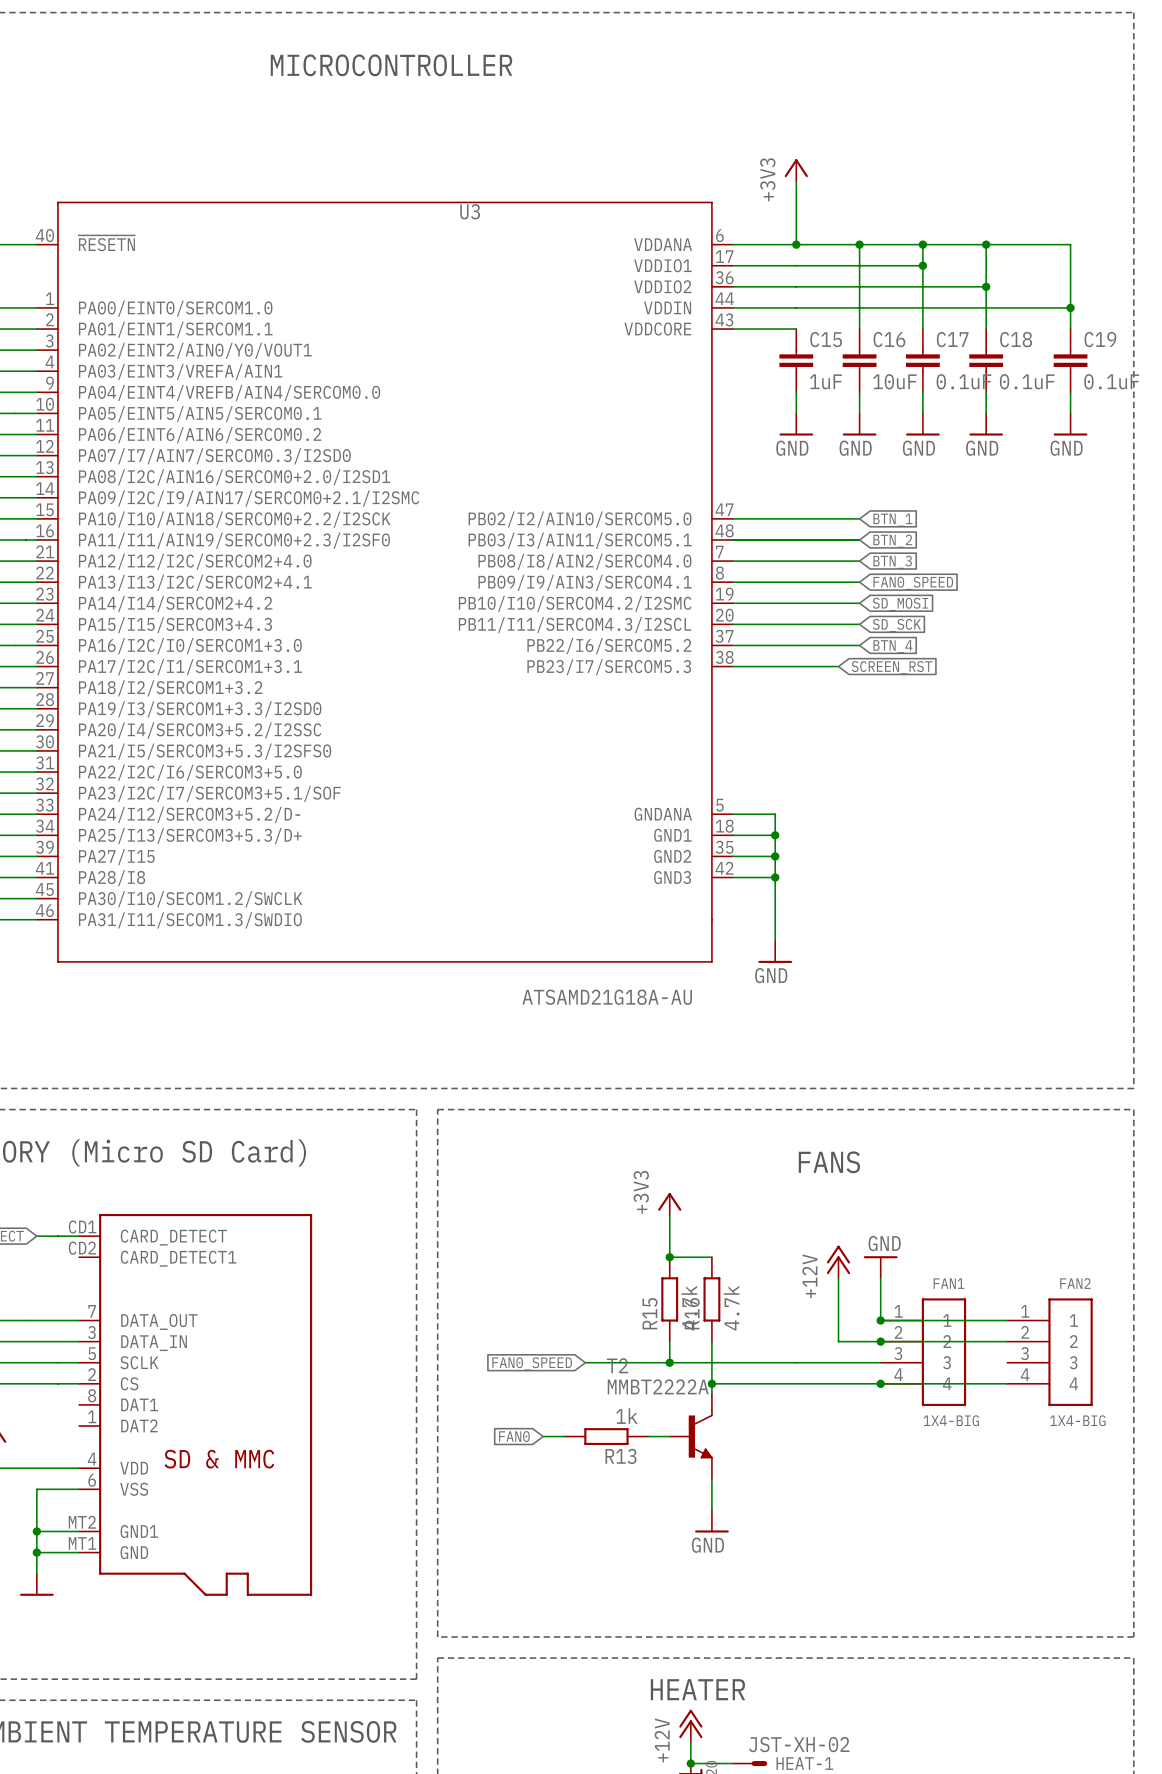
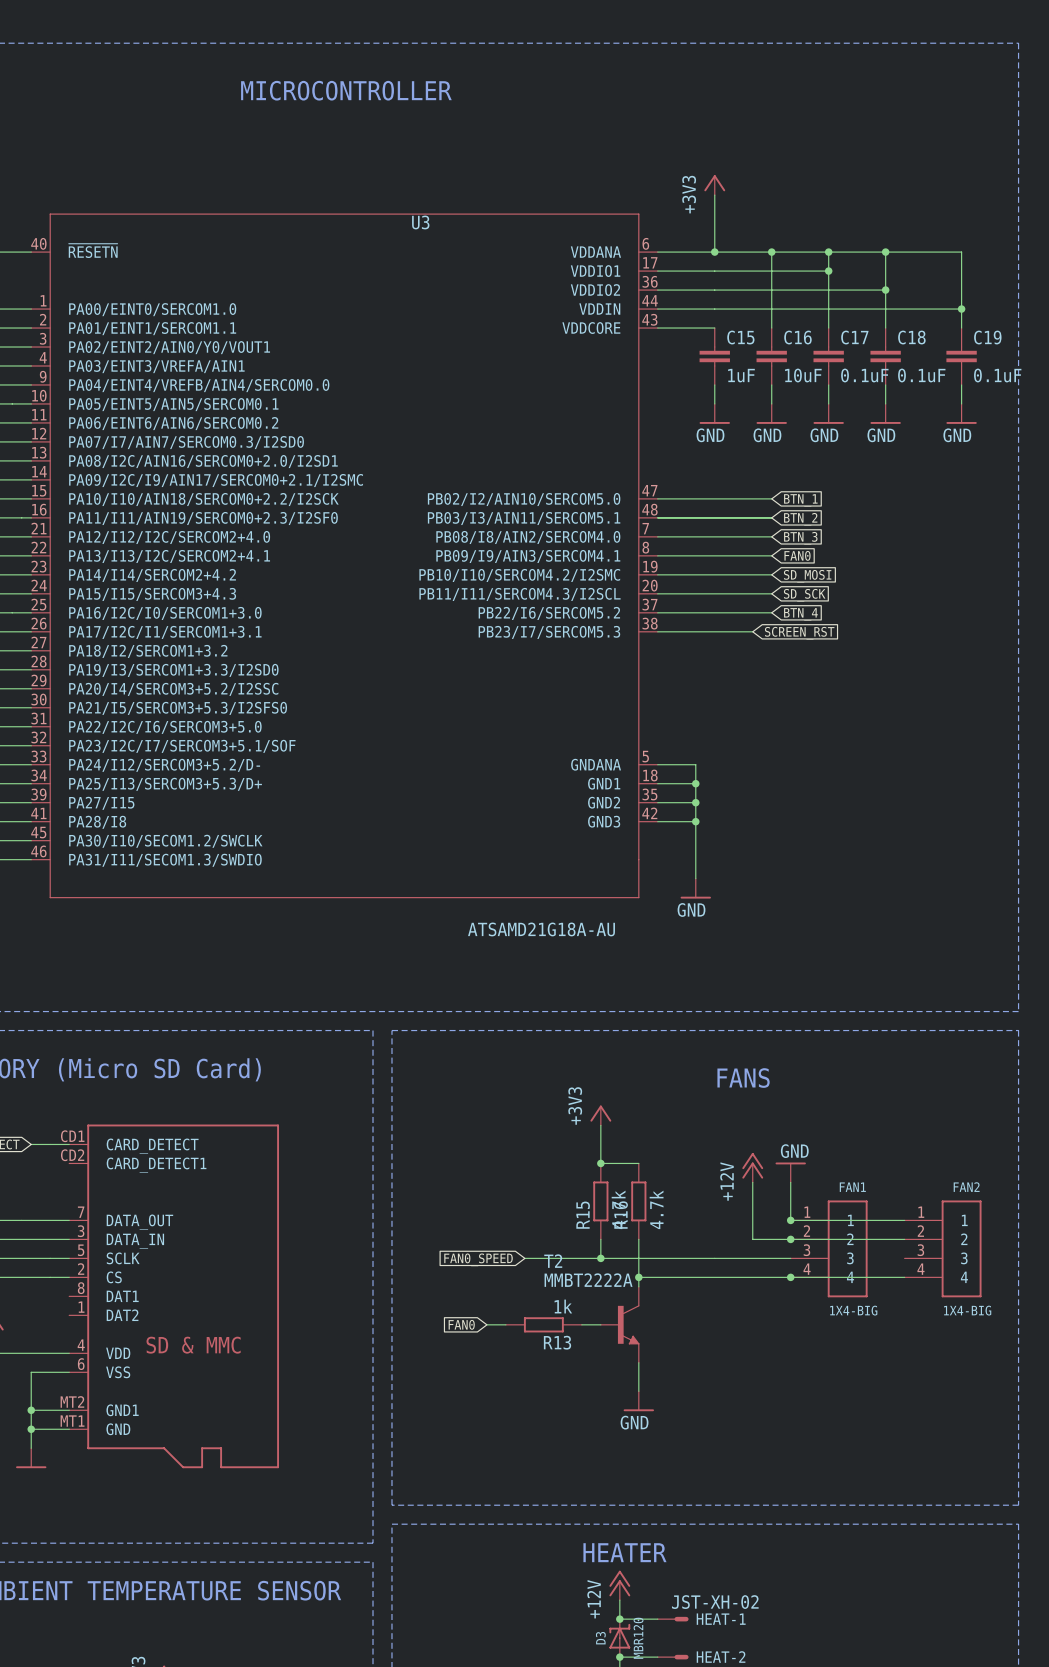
global label: FAN0_SPEED (913, 583) -> FAN0 (797, 555)

